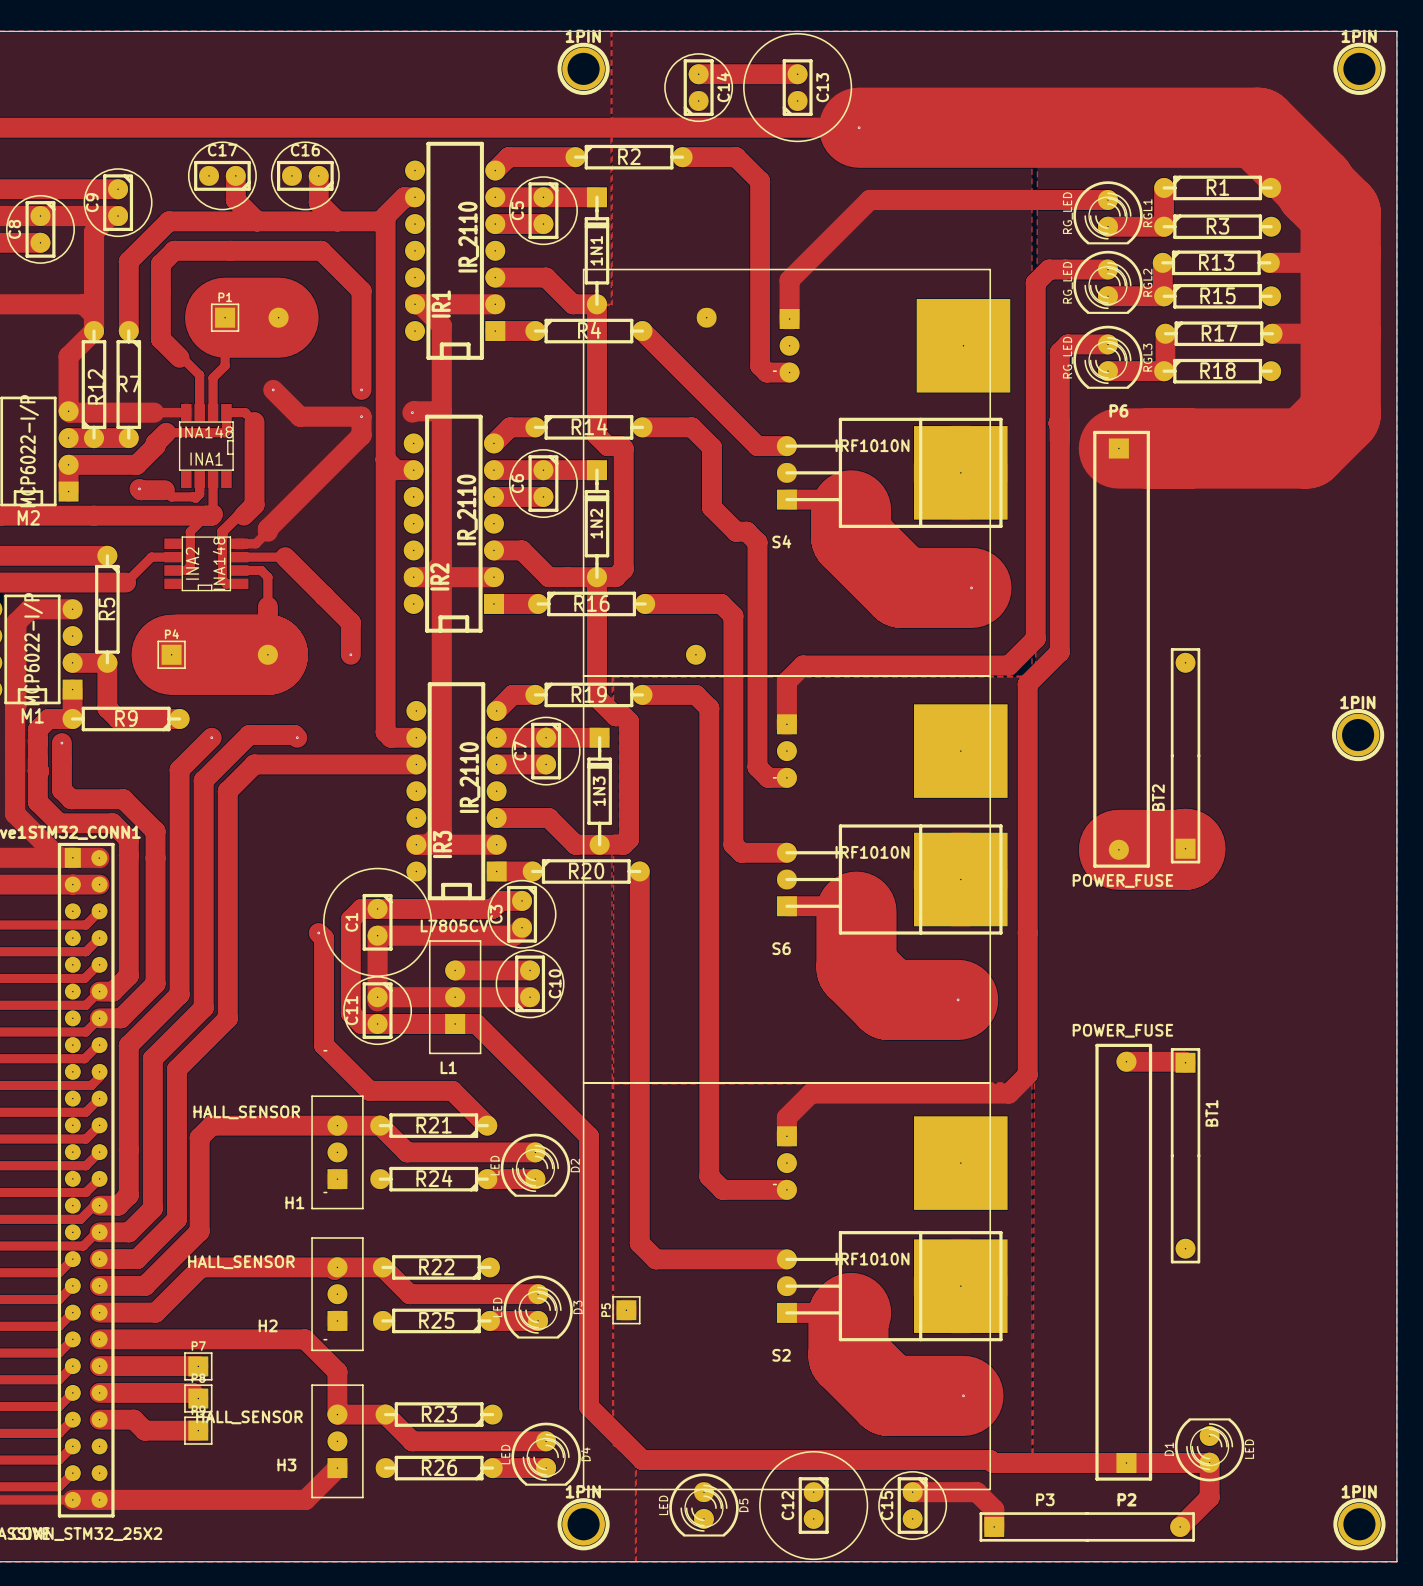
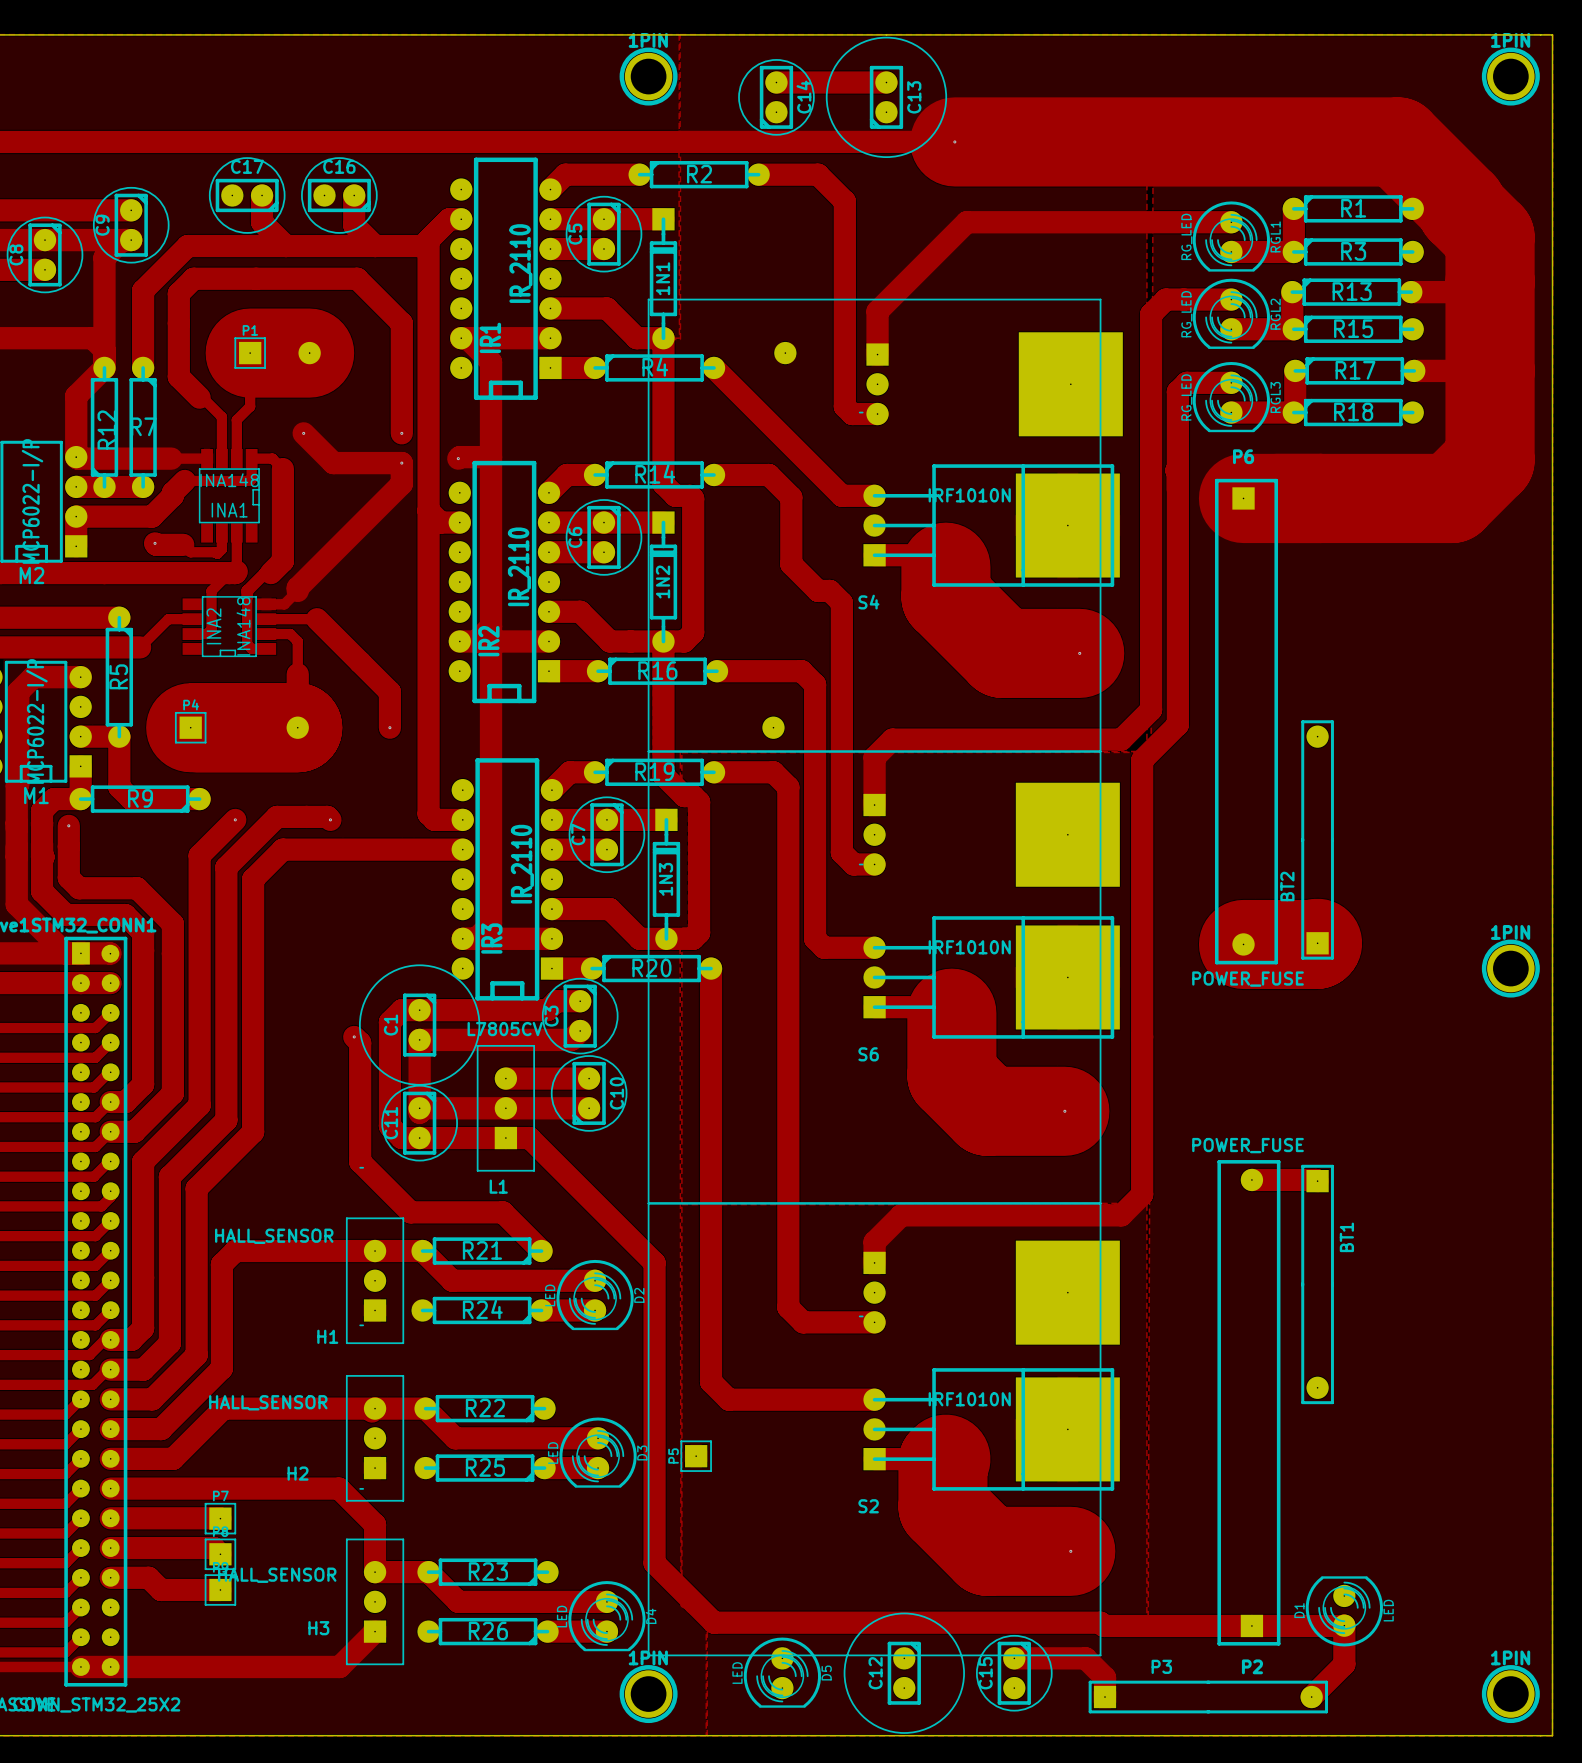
1PIN position: (1358, 735) -> (1510, 968)

